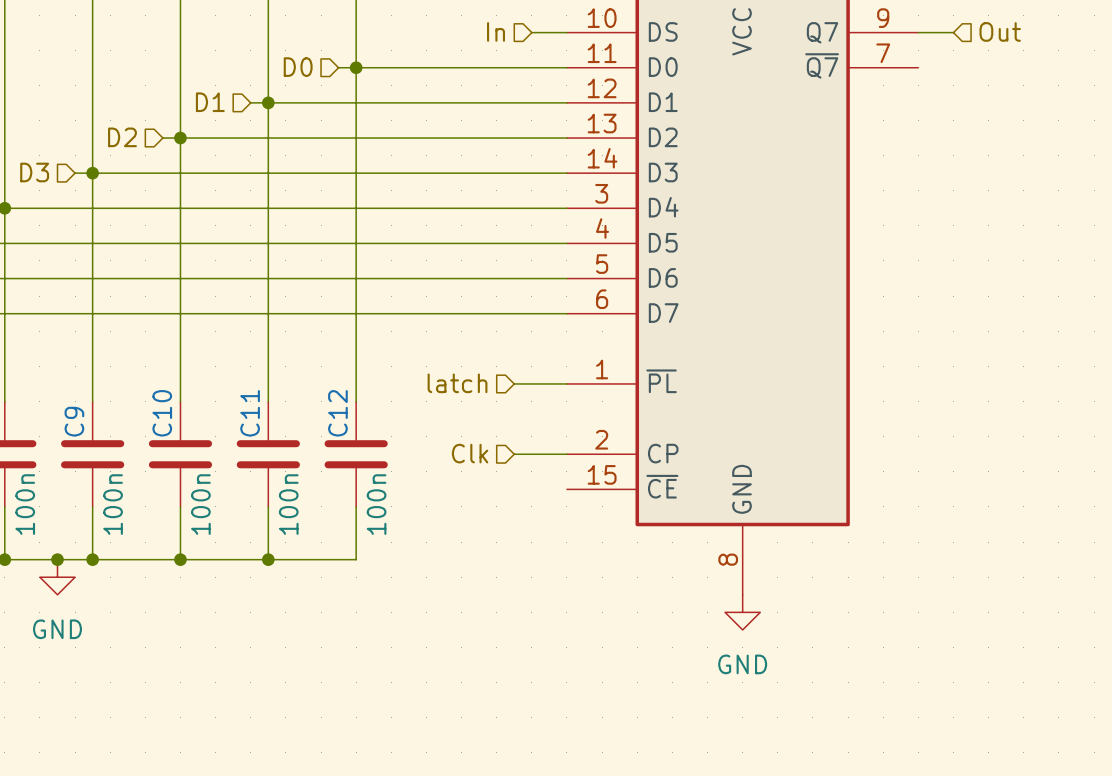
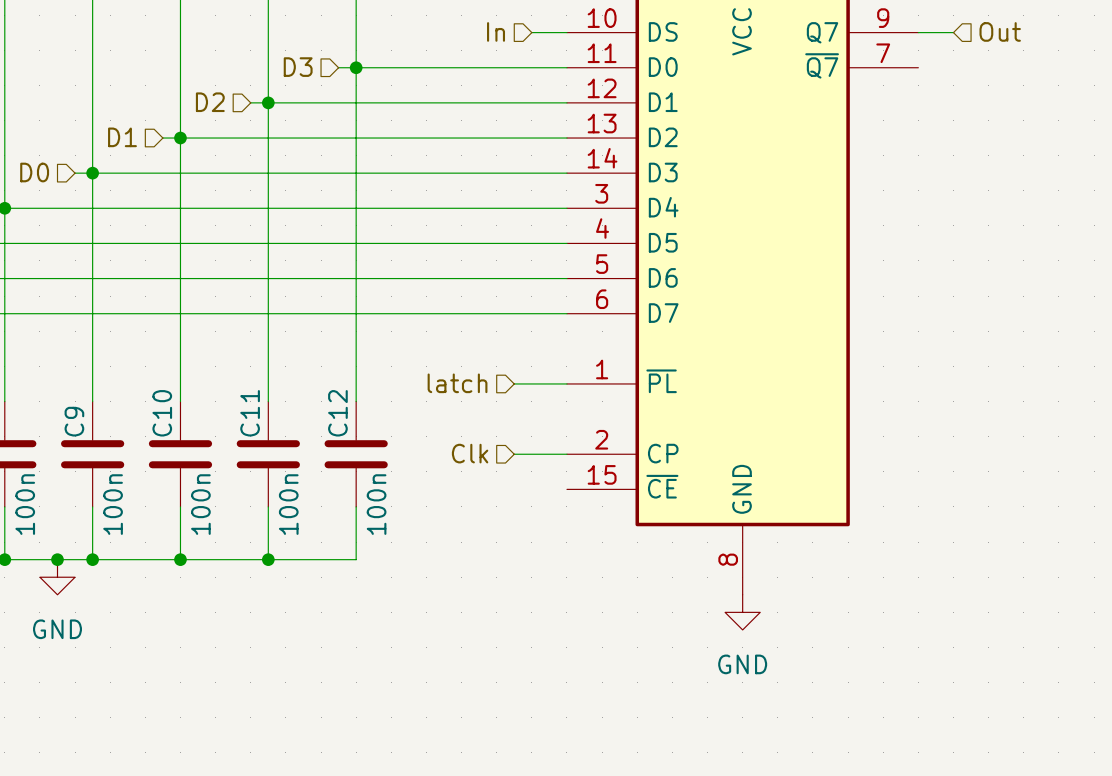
hierarchical label: D0 (298, 67) -> D3 (298, 67)
hierarchical label: D1 (210, 102) -> D2 (210, 102)
hierarchical label: D2 (122, 137) -> D1 (122, 137)
hierarchical label: D3 (34, 172) -> D0 (34, 172)

